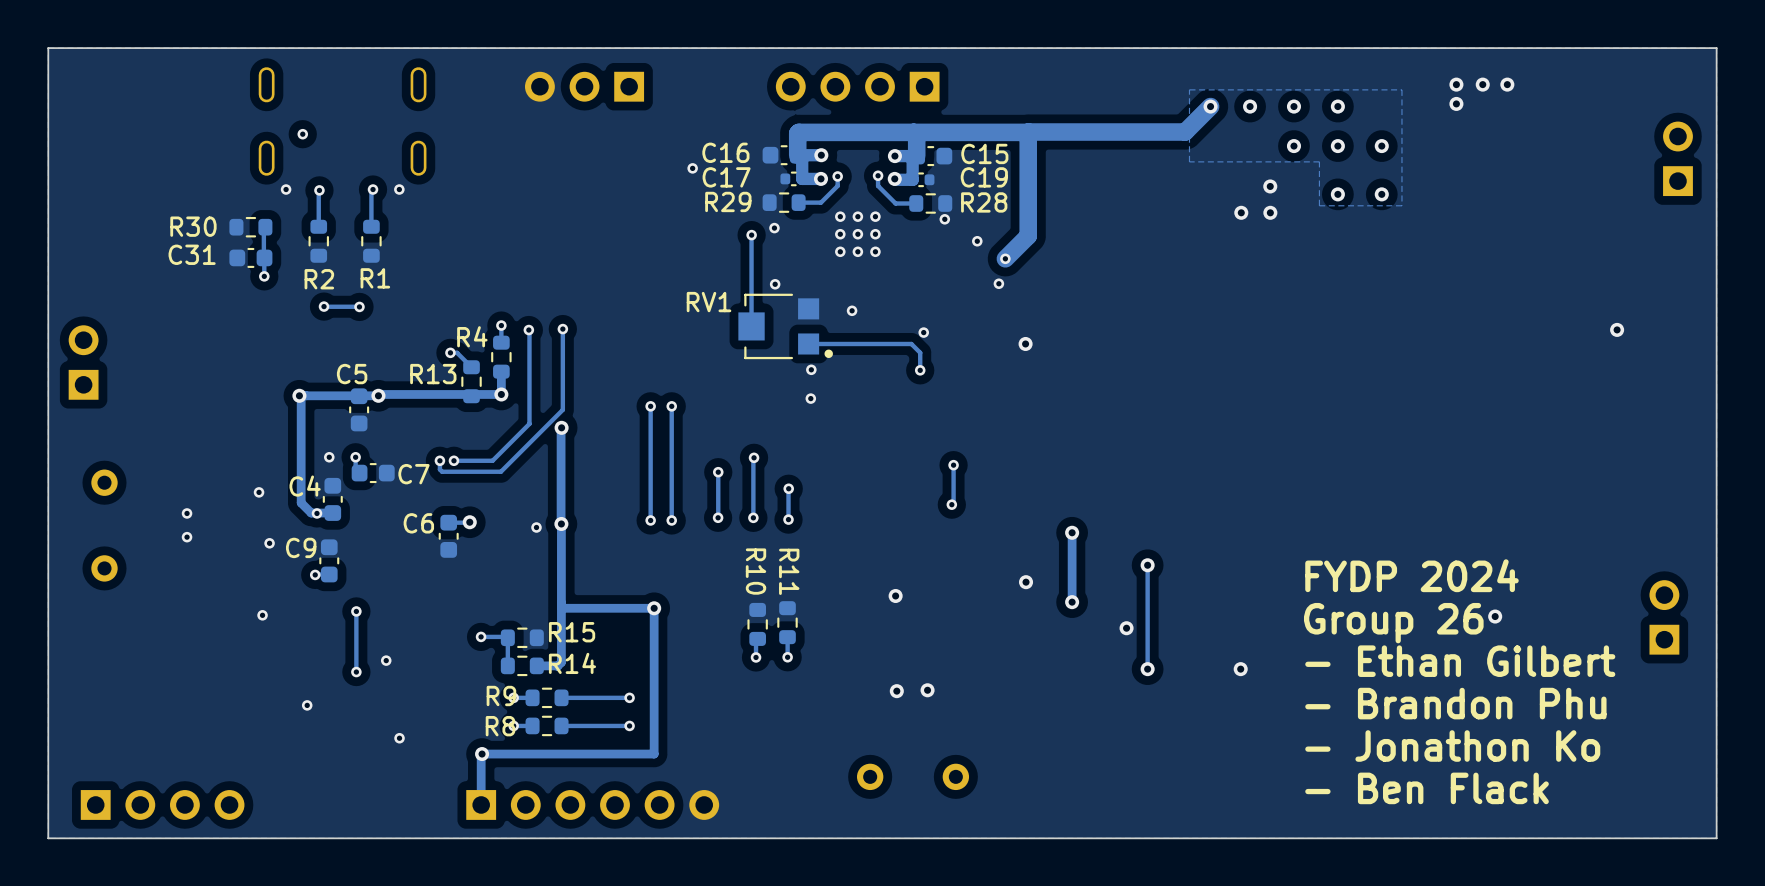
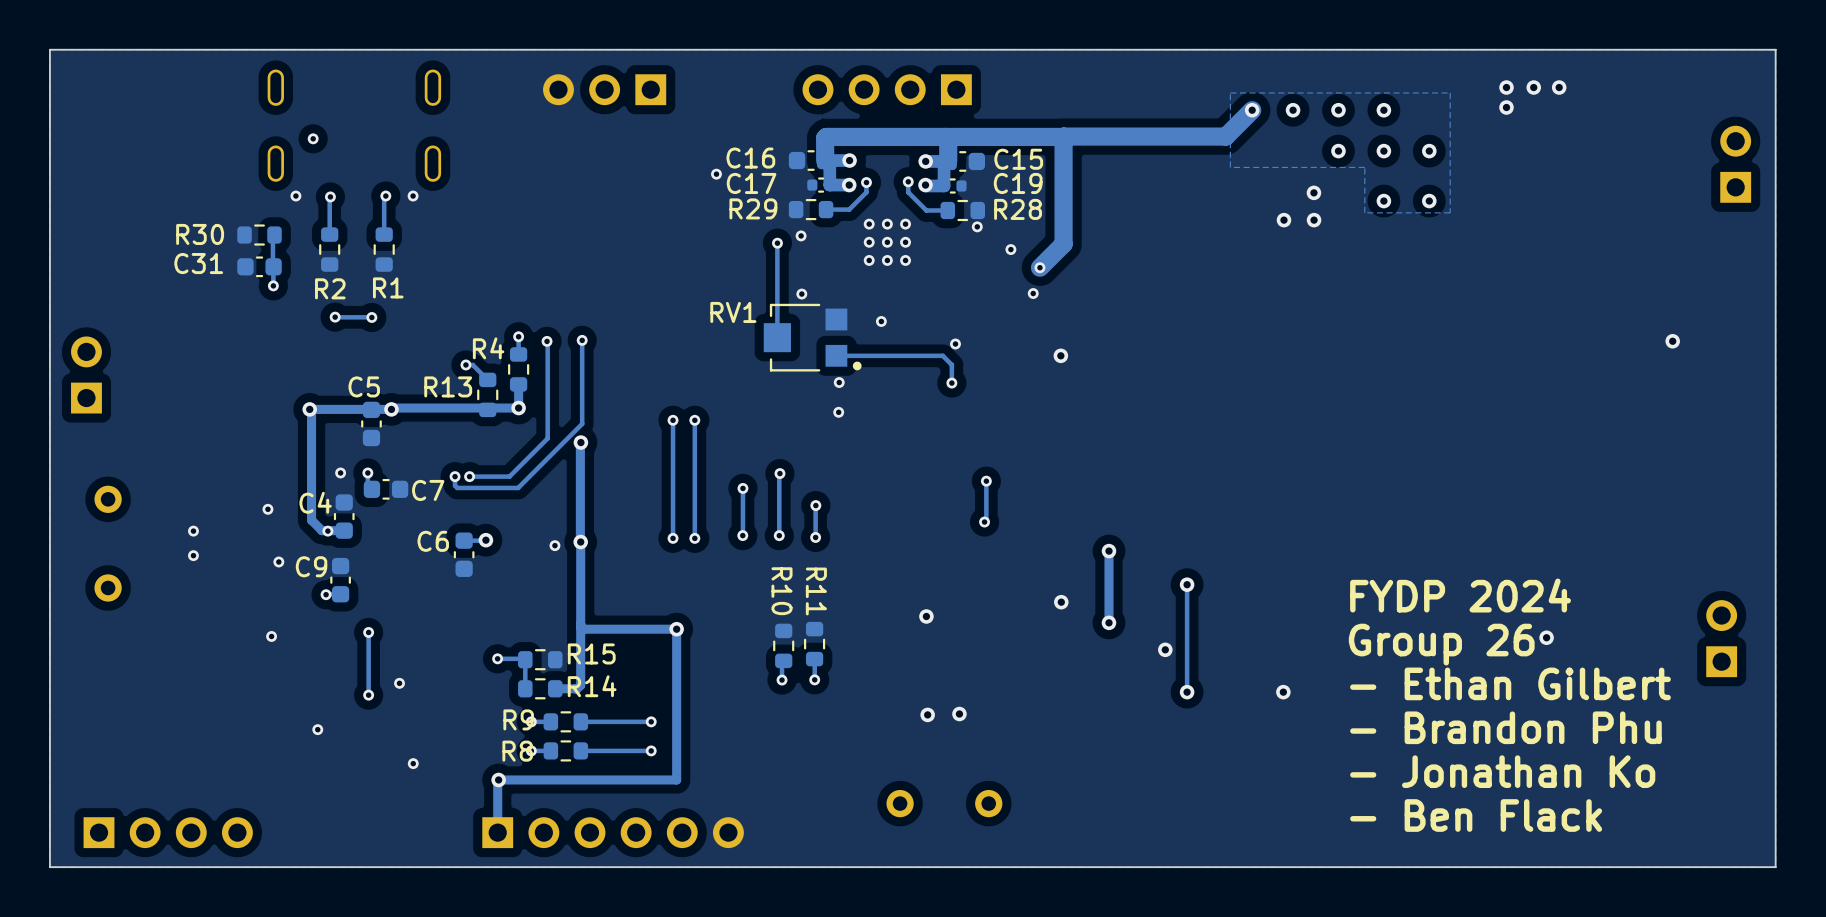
text: - Jonathon Ko (1452, 745) -> - Jonathan Ko (1502, 771)

